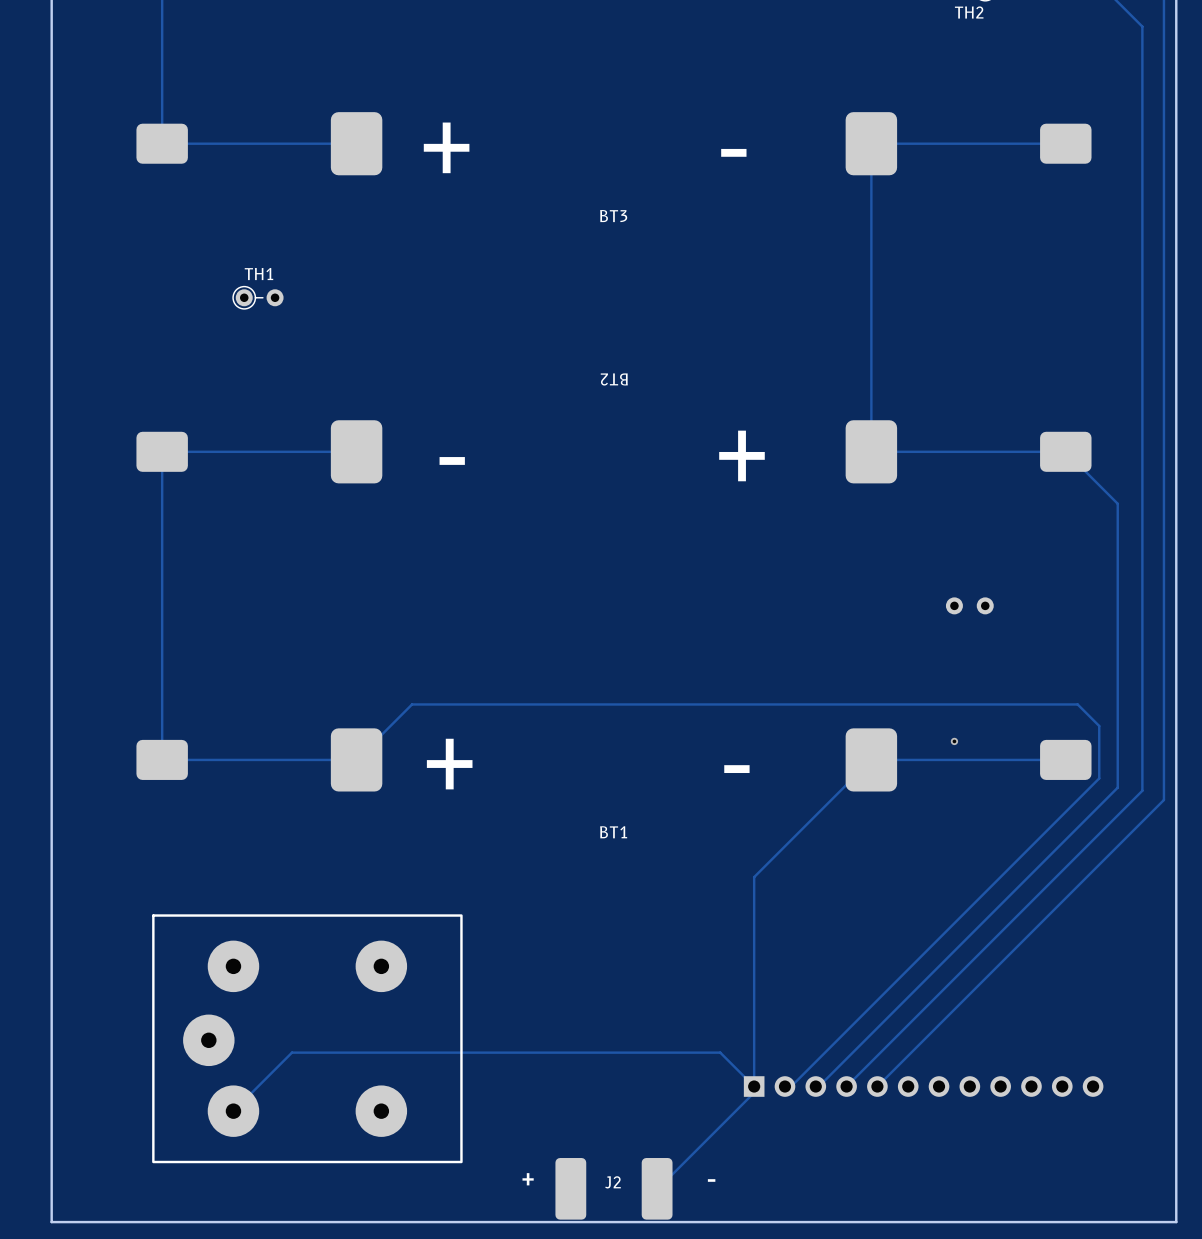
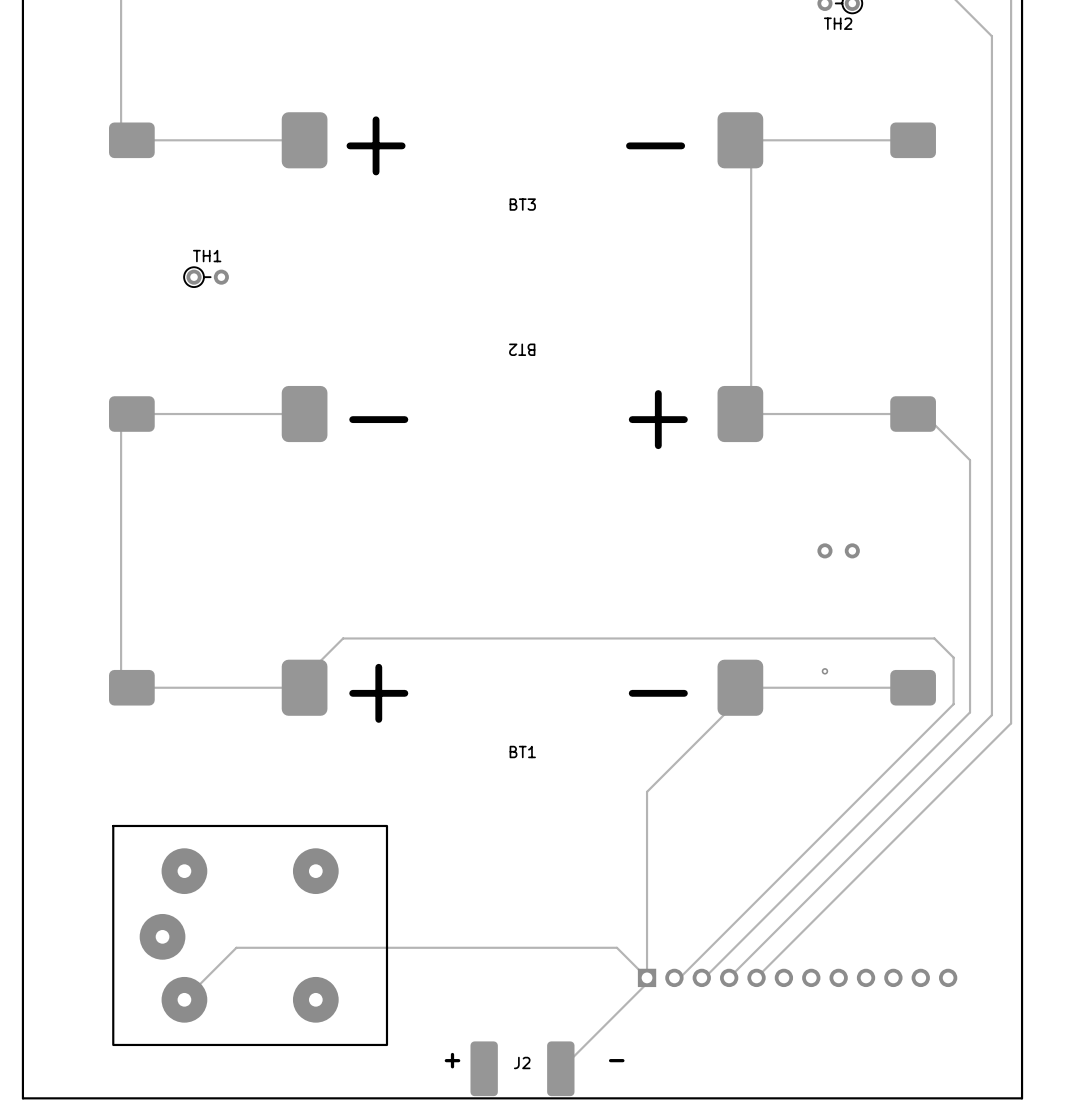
BT3 footprint: [136, 112, 1092, 176] -> [109, 112, 936, 169]
BT2 footprint: [136, 420, 1092, 484] -> [109, 385, 936, 443]
BT1 footprint: [136, 728, 1092, 792] -> [109, 659, 936, 716]

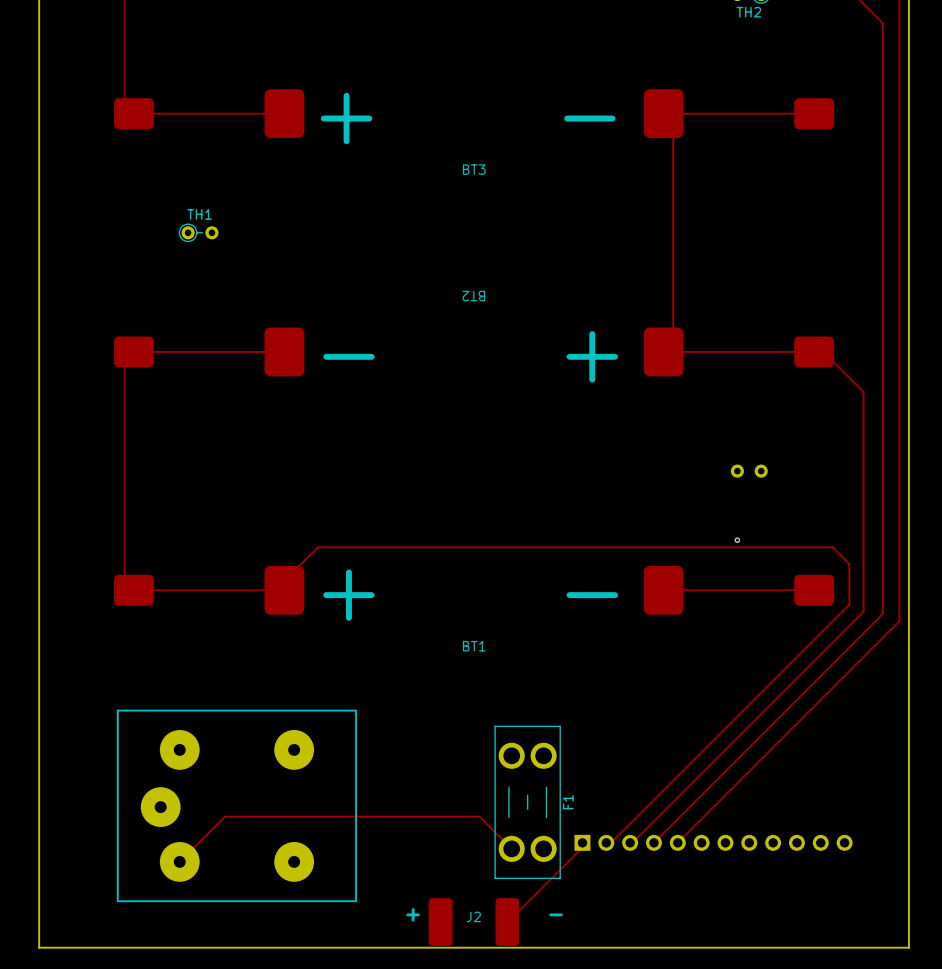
via position: (824, 671) -> (737, 540)
track: (751, 687) (647, 791) (647, 977) (616, 947) (528, 947) -> (511, 848) (479, 816)
F1: none -> (527, 802)

